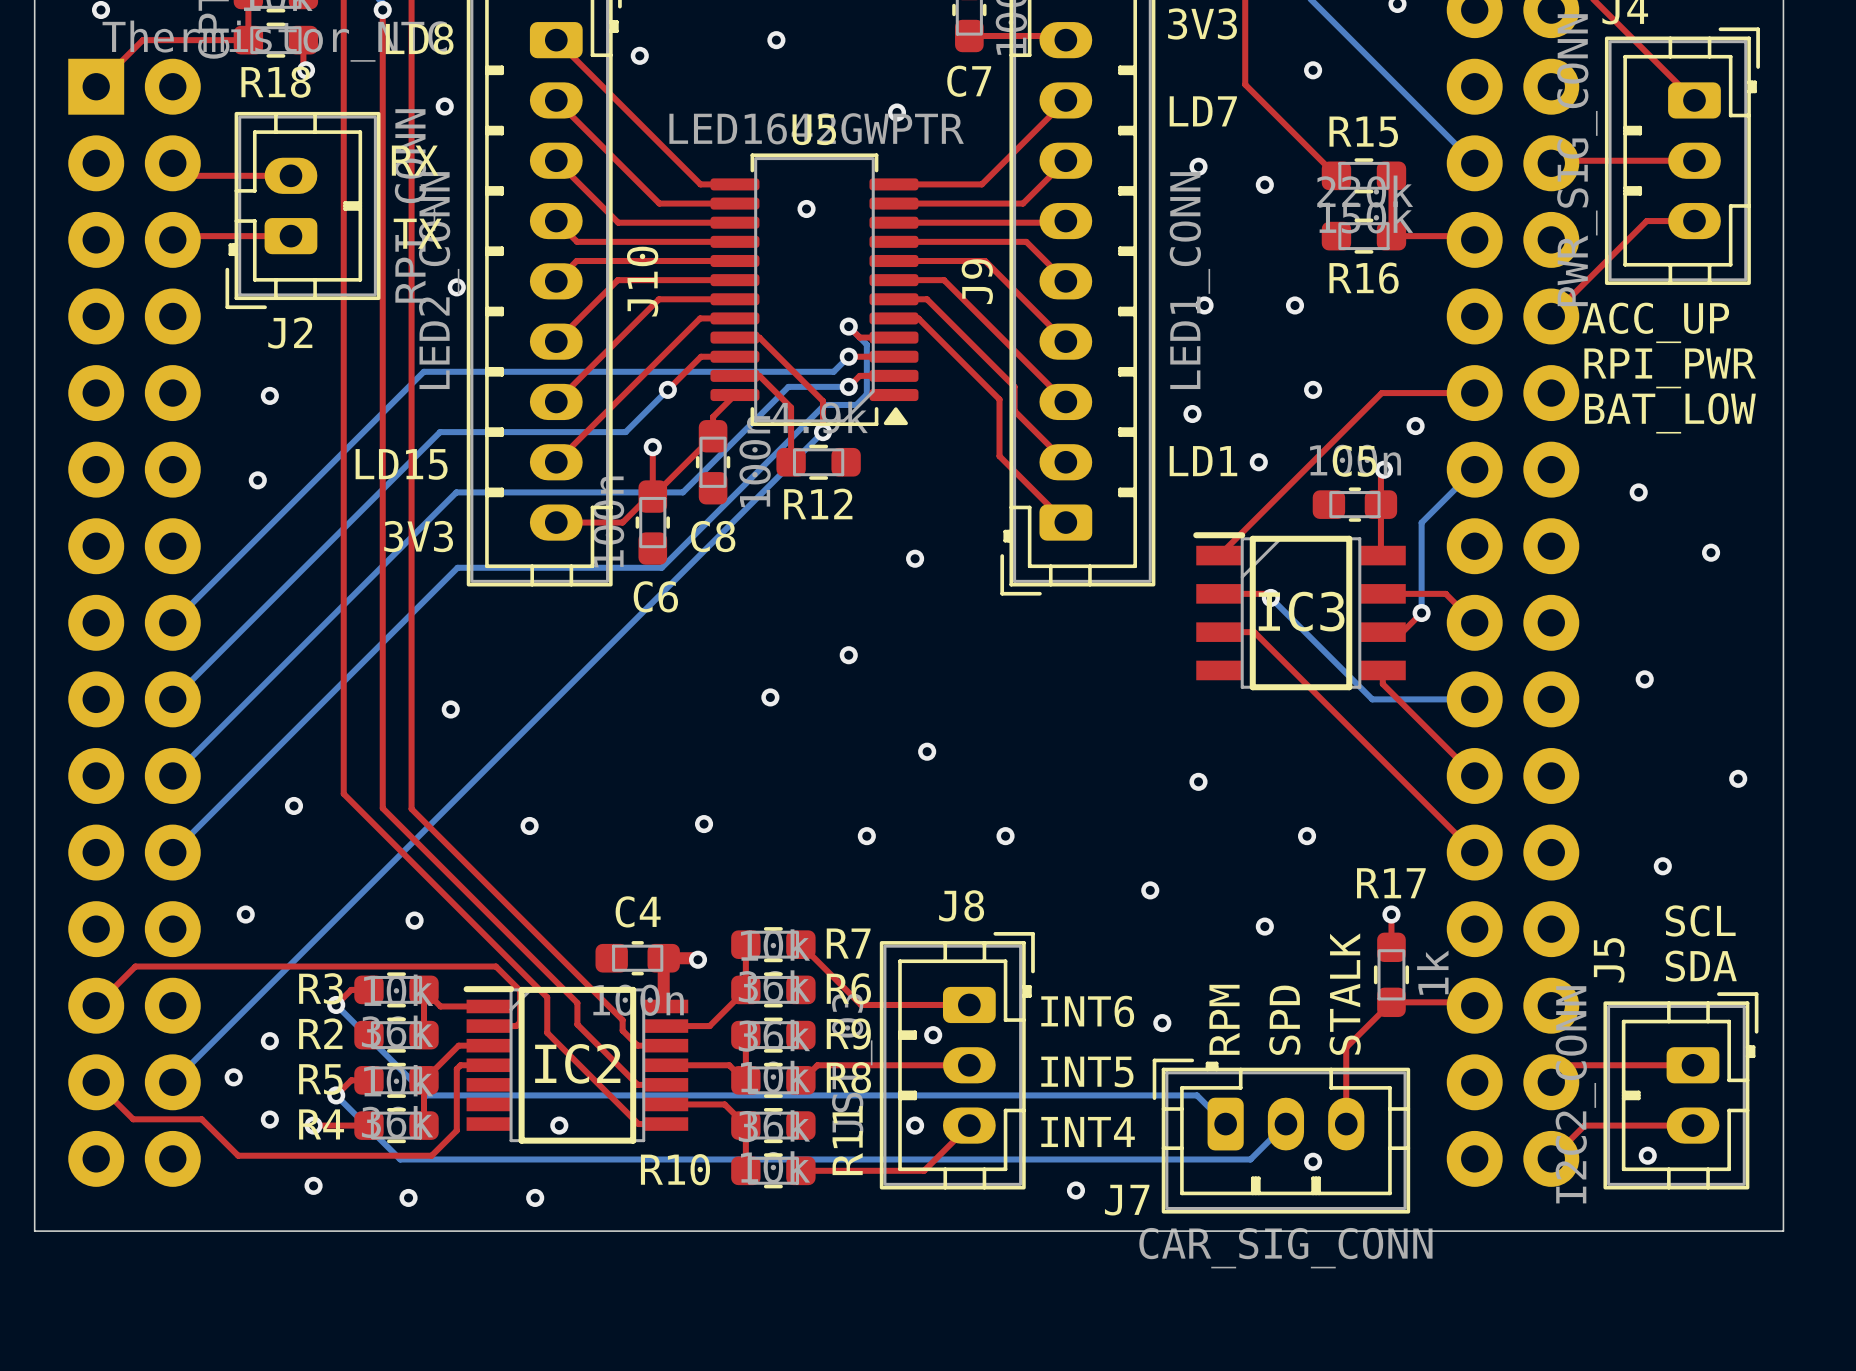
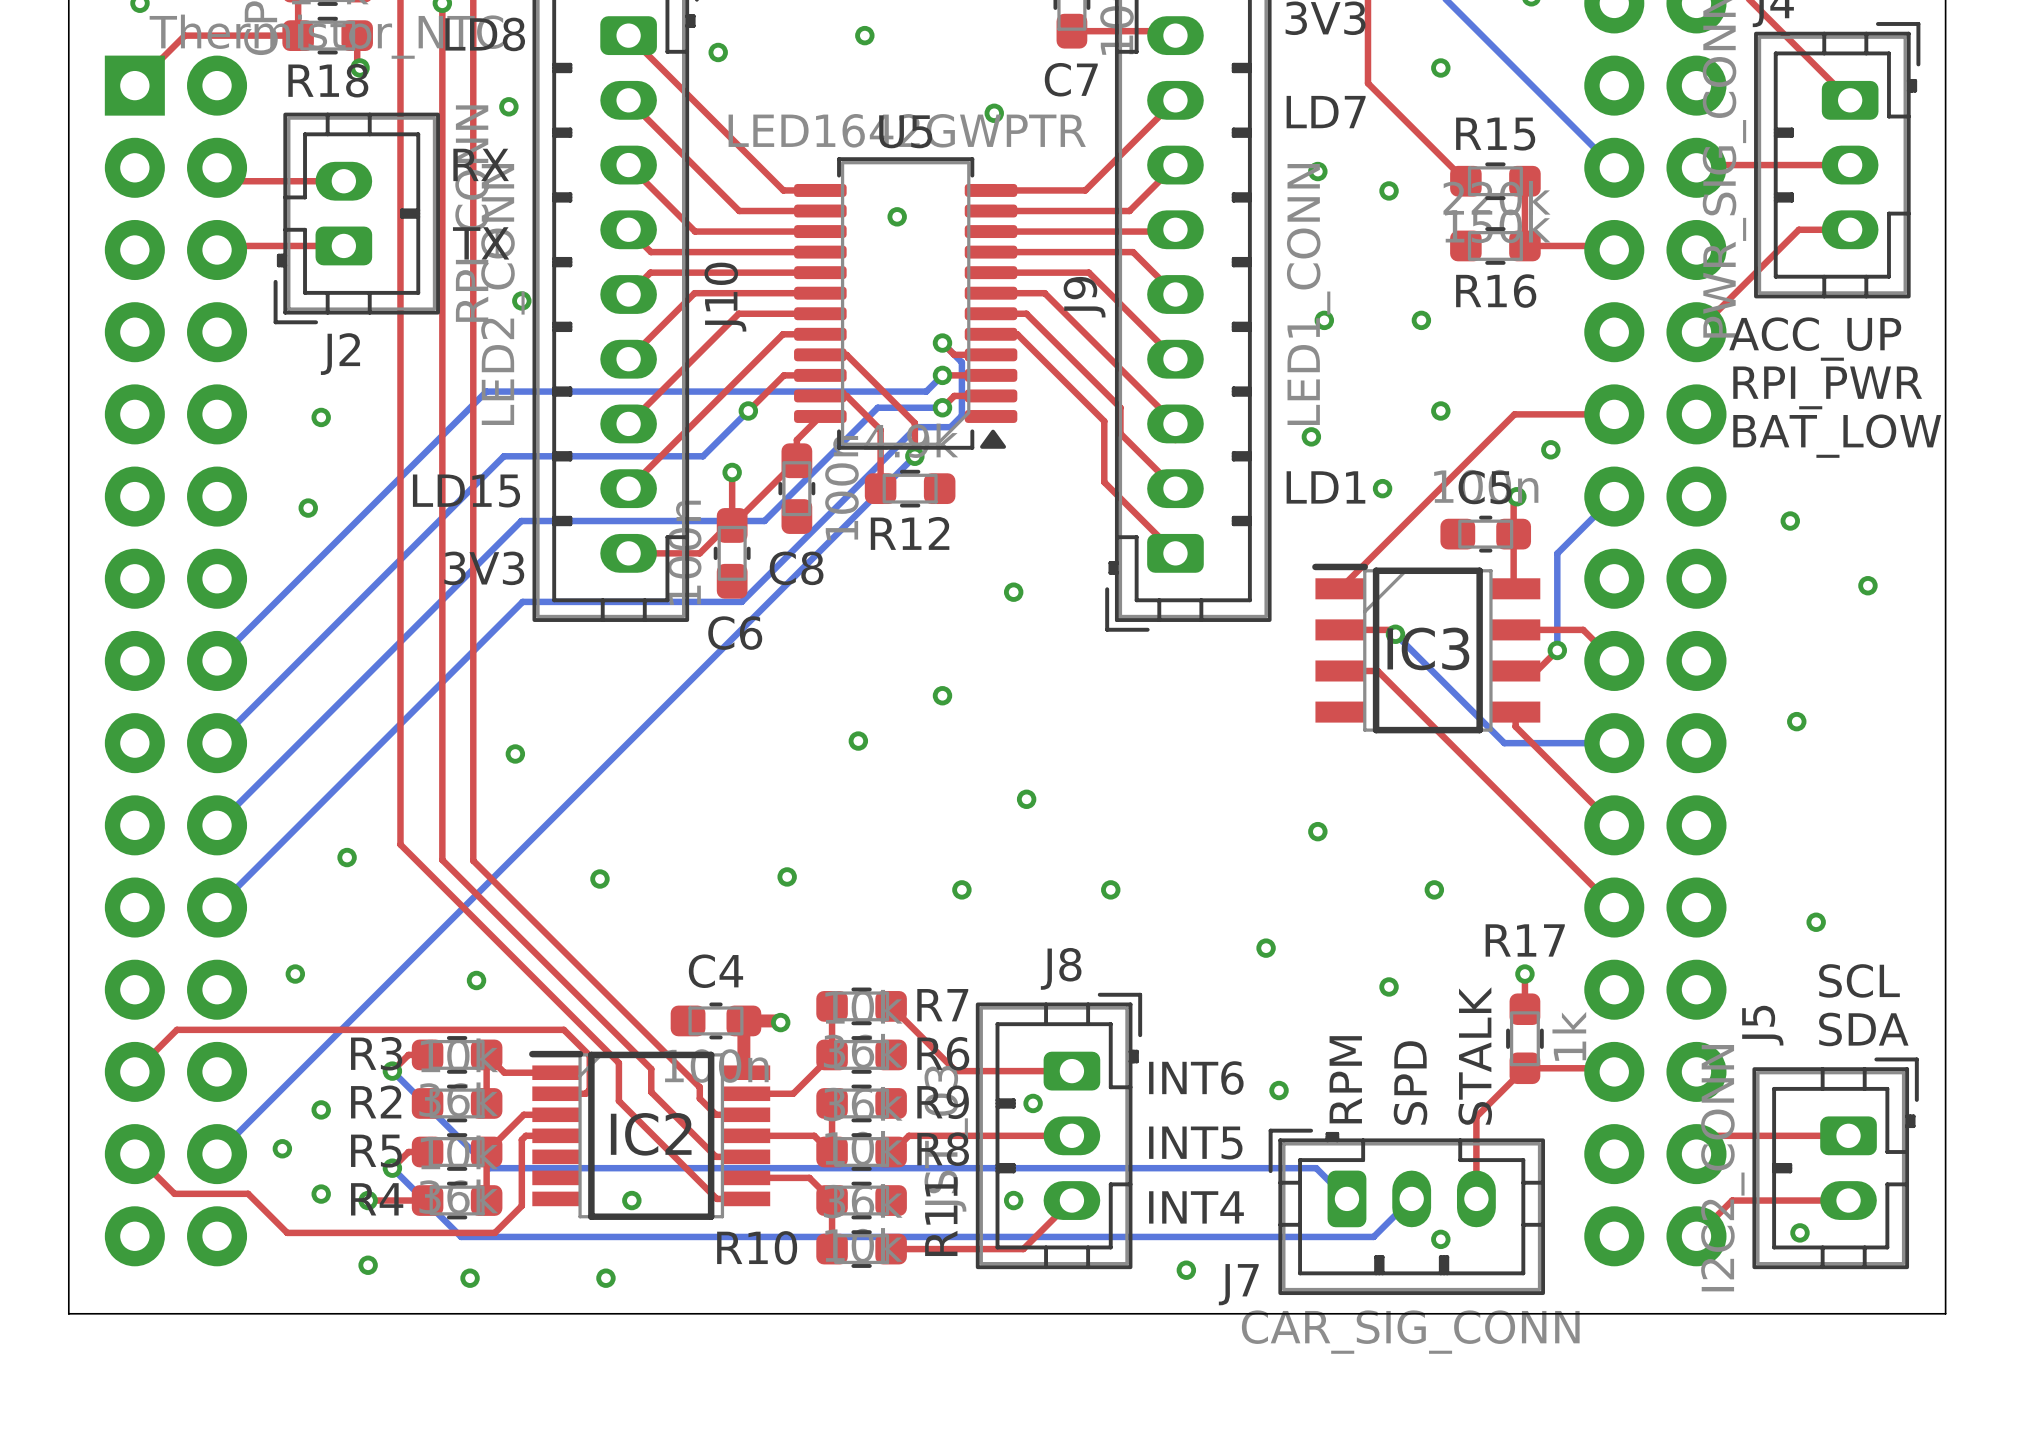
via: (1738, 778) -> none

